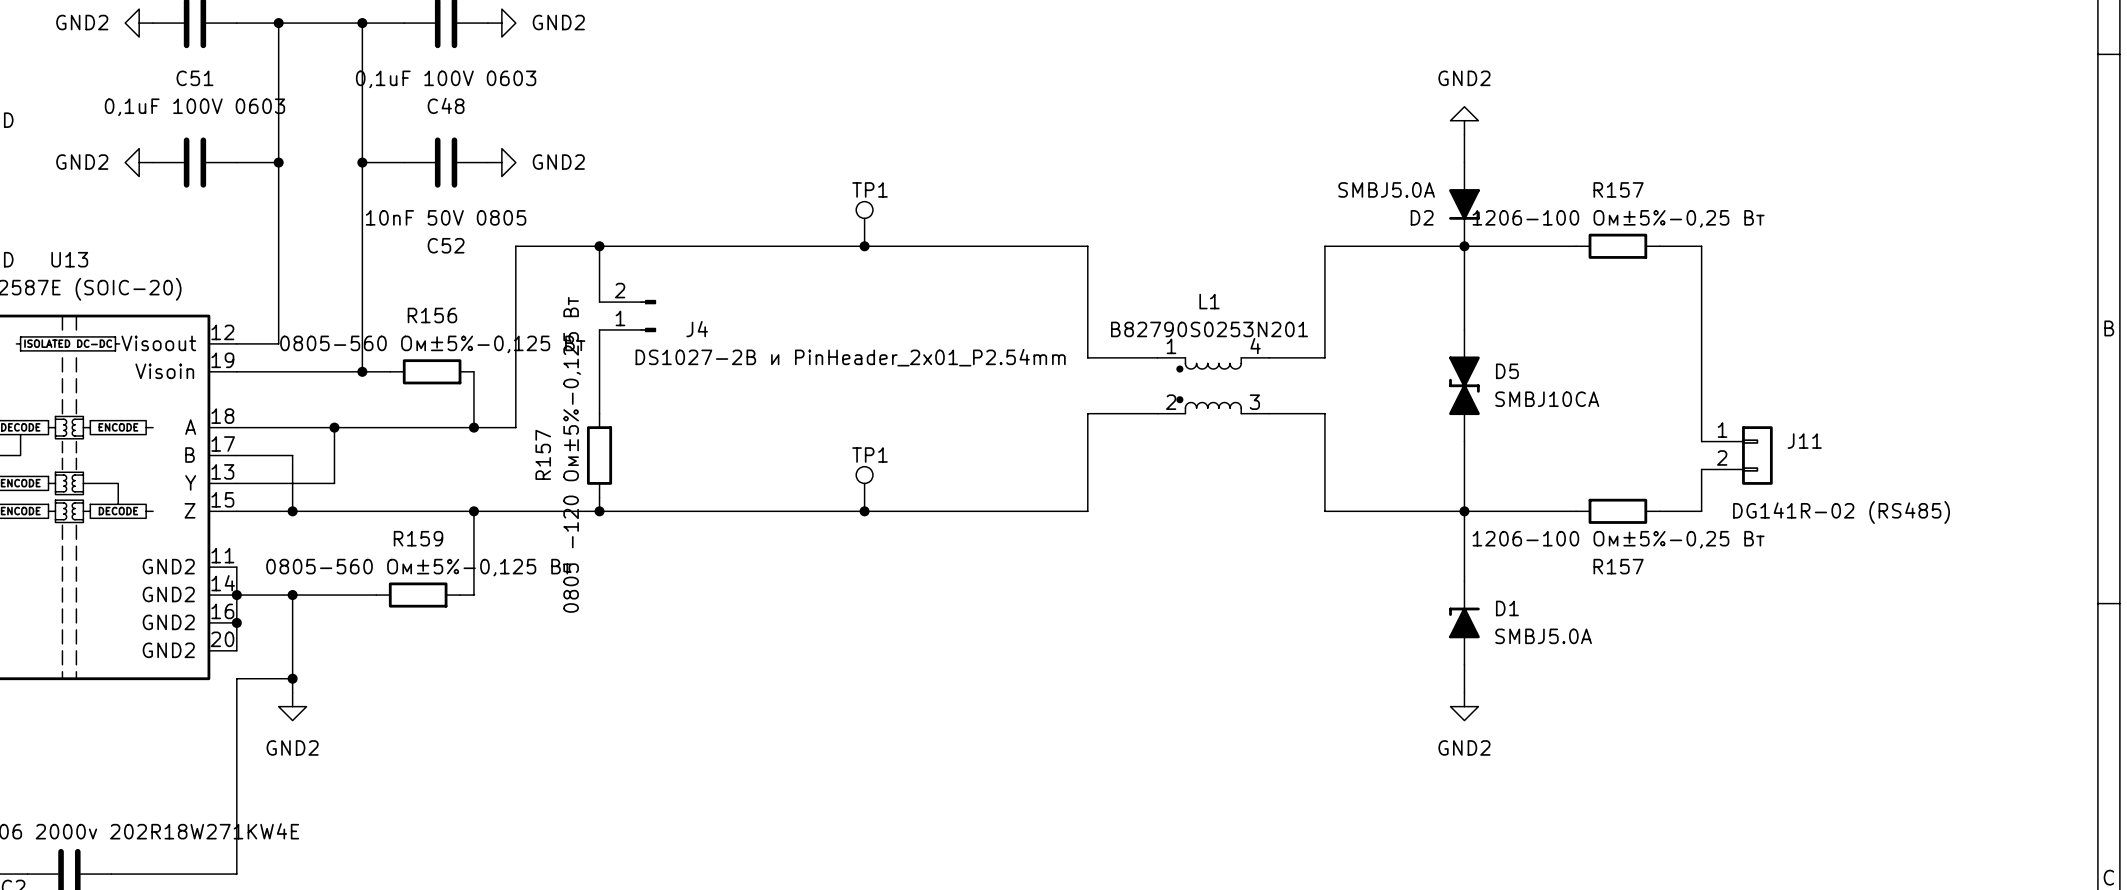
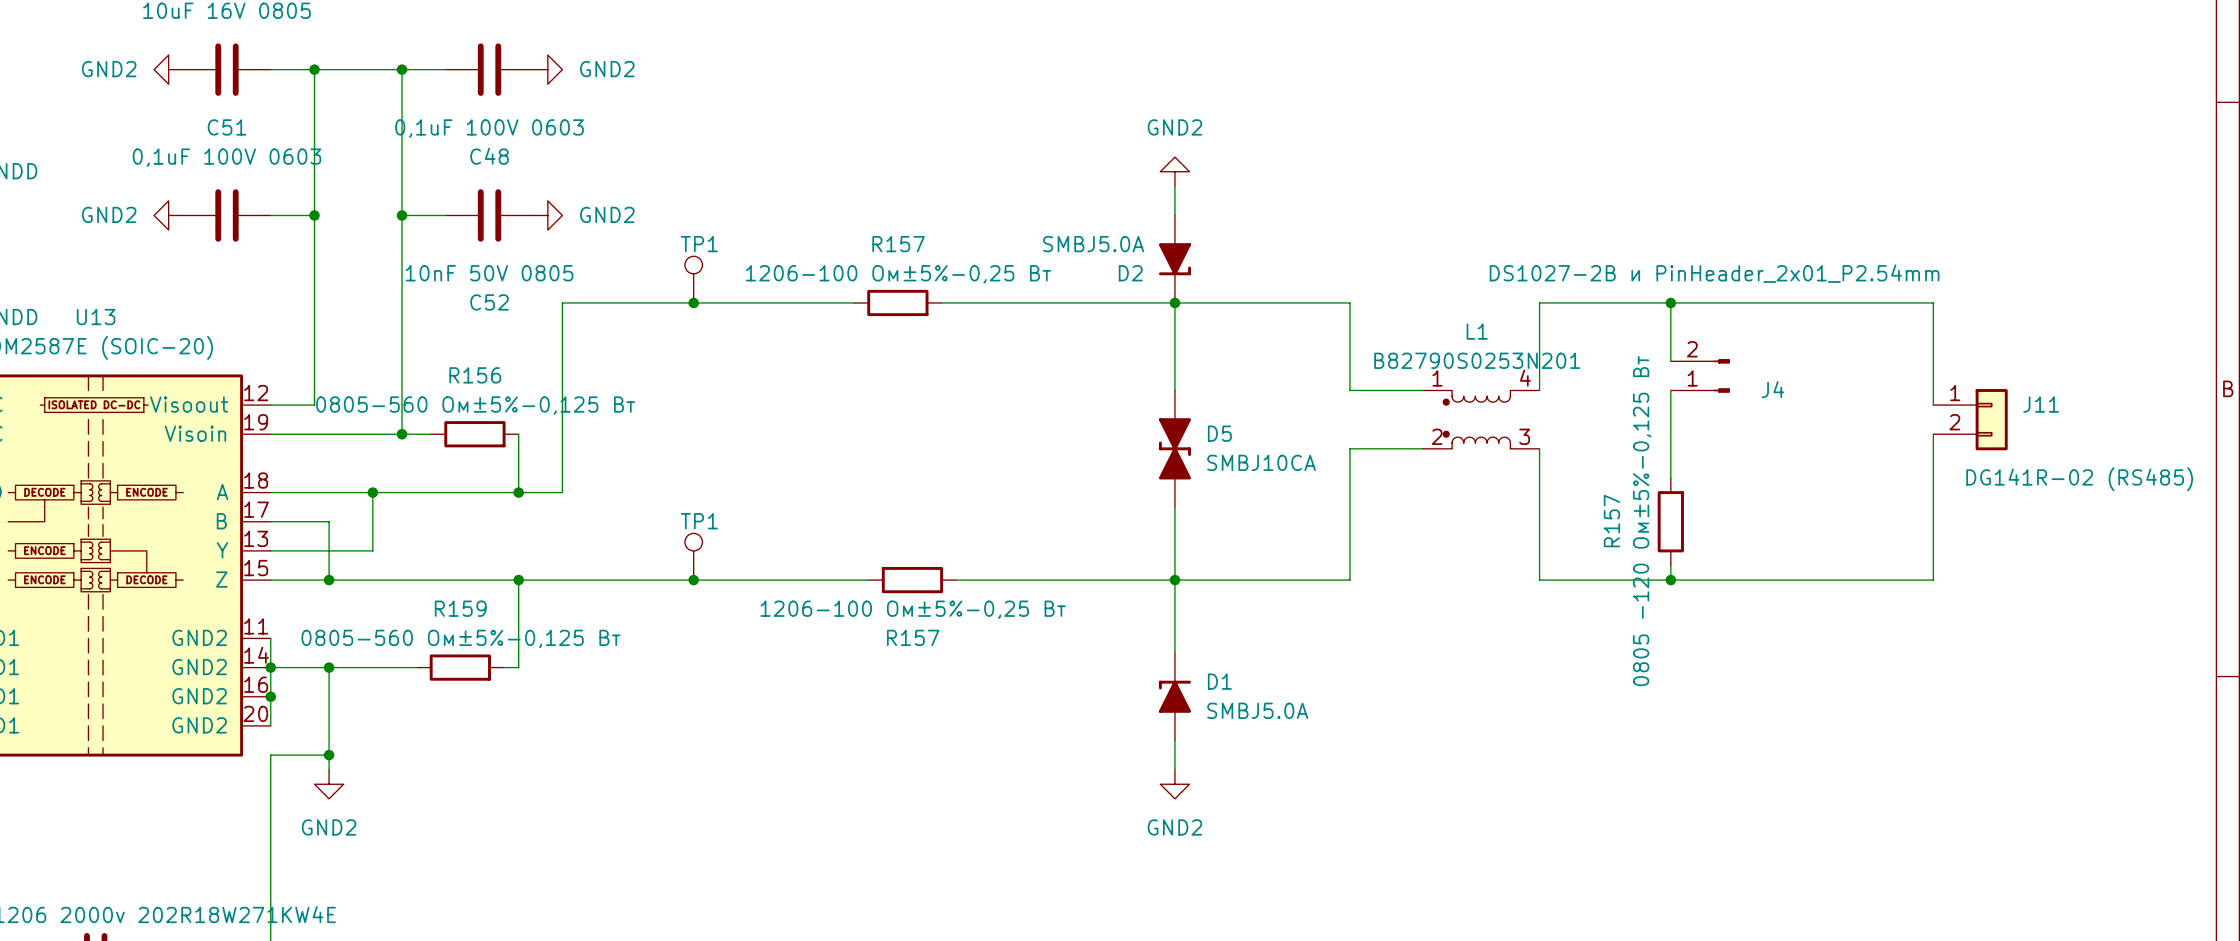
power symbol: none -> GND2 (1174, 171)
power symbol: GND2 (1464, 120) -> none
wire: none -> (1174, 186) (1174, 215)
wire: (1464, 134) (1464, 162) -> none
D2 position: (1464, 204) -> (1174, 259)
TP1: none -> (693, 279)
TP1: (864, 223) -> none
wire: (599, 246) (599, 302) -> none
junction position: (599, 246) -> (693, 302)
wire: (794, 246) (878, 246) -> none
R157: none -> 1206-100 Ом±5%-0,25 Вт (897, 302)
junction: (864, 246) -> none
wire: (1087, 246) (1087, 357) (1157, 357) -> (1160, 302) (1349, 302) (1349, 390) (1422, 390)
wire: none -> (1174, 302) (1174, 390)
junction: none -> (1174, 302)
wire: (1450, 246) (1324, 246) (1324, 357) (1269, 357) -> (1539, 302) (1539, 390)
wire: (1464, 246) (1464, 329) -> (1670, 390) (1670, 477)
junction: (1464, 246) -> none
junction: none -> (1670, 302)
R157: 1206-100 Ом±5%-0,25 Вт (1617, 246) -> none
wire: none -> (1758, 302) (1670, 302) (1670, 361)
wire: (1701, 246) (1701, 441) -> (1802, 302) (1933, 302) (1933, 405)
J4 position: (627, 316) -> (1700, 375)
wire: (599, 329) (599, 413) -> none
J4 value position: DS1027-2B и PinHeader_2x01_P2.54mm (850, 357) -> DS1027-2B и PinHeader_2x01_P2.54mm (1714, 273)
L1 position: (1213, 385) -> (1481, 419)
D5 position: (1464, 385) -> (1174, 448)
wire: (1157, 413) (1087, 413) (1087, 511) -> (1422, 448) (1349, 448) (1349, 580) (1160, 580)
wire: (1269, 413) (1324, 413) (1324, 511) (1450, 511) -> (1539, 448) (1539, 580)
wire: none -> (1174, 507) (1174, 653)
wire: (1464, 441) (1464, 581) -> none
R157: 0805 -120 Ом±5%-0,125 Вт (599, 455) -> none
R157: none -> 0805 -120 Ом±5%-0,125 Вт (1670, 521)
J11 position: (1737, 455) -> (1970, 419)
wire: (1701, 469) (1701, 511) -> (1933, 434) (1933, 580) (1802, 580)
TP1: none -> (693, 556)
TP1: (864, 489) -> none
wire: (599, 497) (599, 511) -> none
wire: none -> (1670, 565) (1670, 580) (1758, 580)
junction position: (599, 511) -> (693, 580)
wire: (808, 511) (892, 511) -> none
R157: none -> 1206-100 Ом±5%-0,25 Вт (912, 580)
junction: (864, 511) -> none
junction: none -> (1174, 580)
junction: (1464, 511) -> none
junction: none -> (1670, 580)
R157: 1206-100 Ом±5%-0,25 Вт (1617, 511) -> none
D1 position: (1464, 622) -> (1174, 696)
wire: none -> (1174, 740) (1174, 769)
wire: (1464, 664) (1464, 692) -> none
power symbol: none -> GND2 (1174, 784)
power symbol: GND2 (1464, 706) -> none

